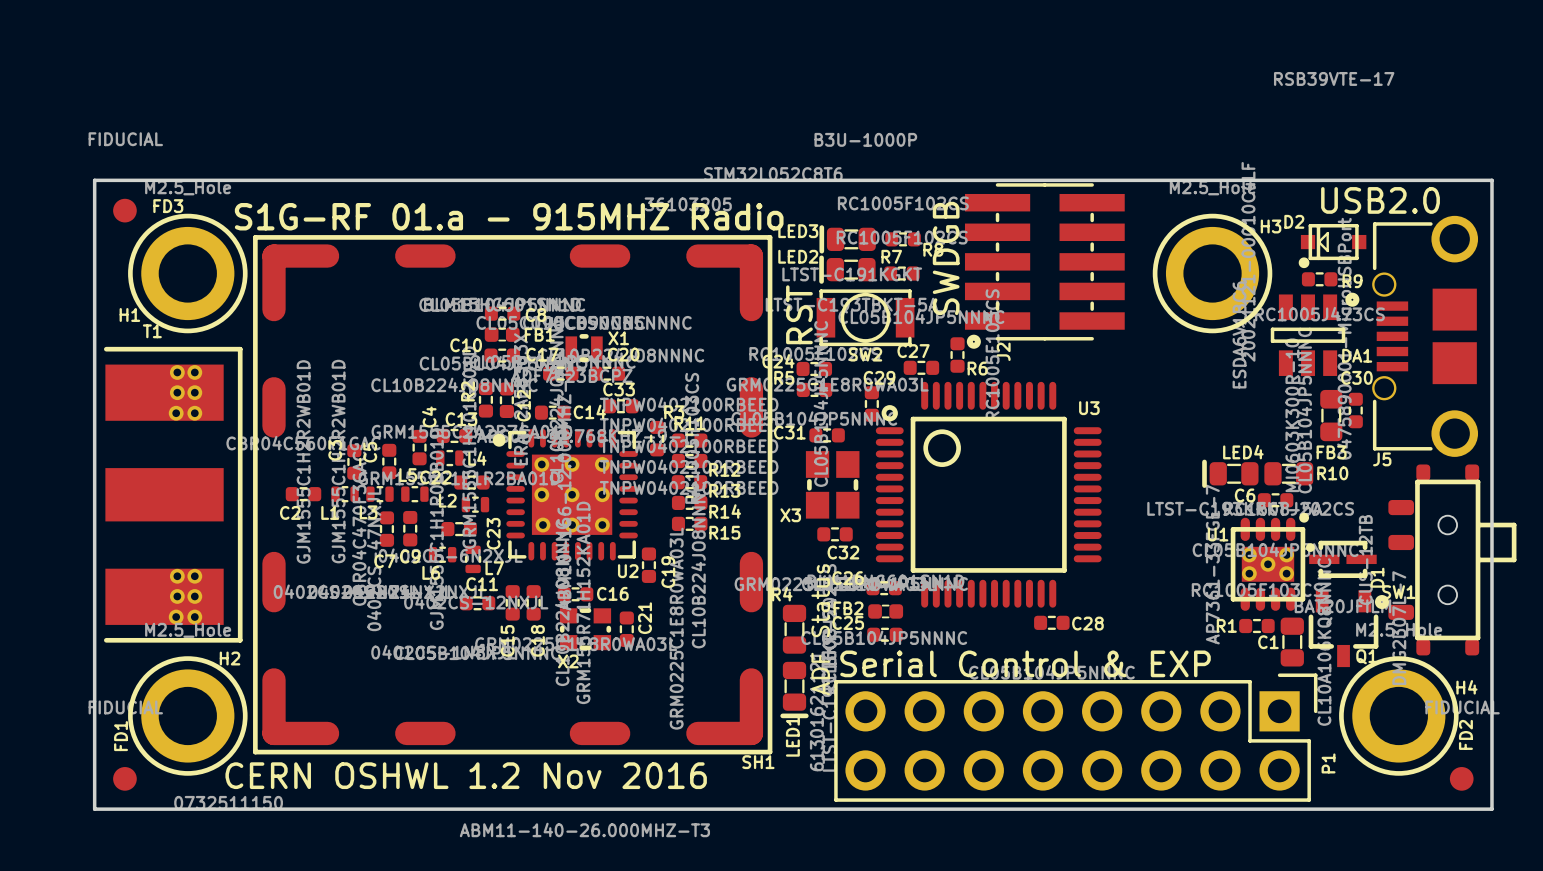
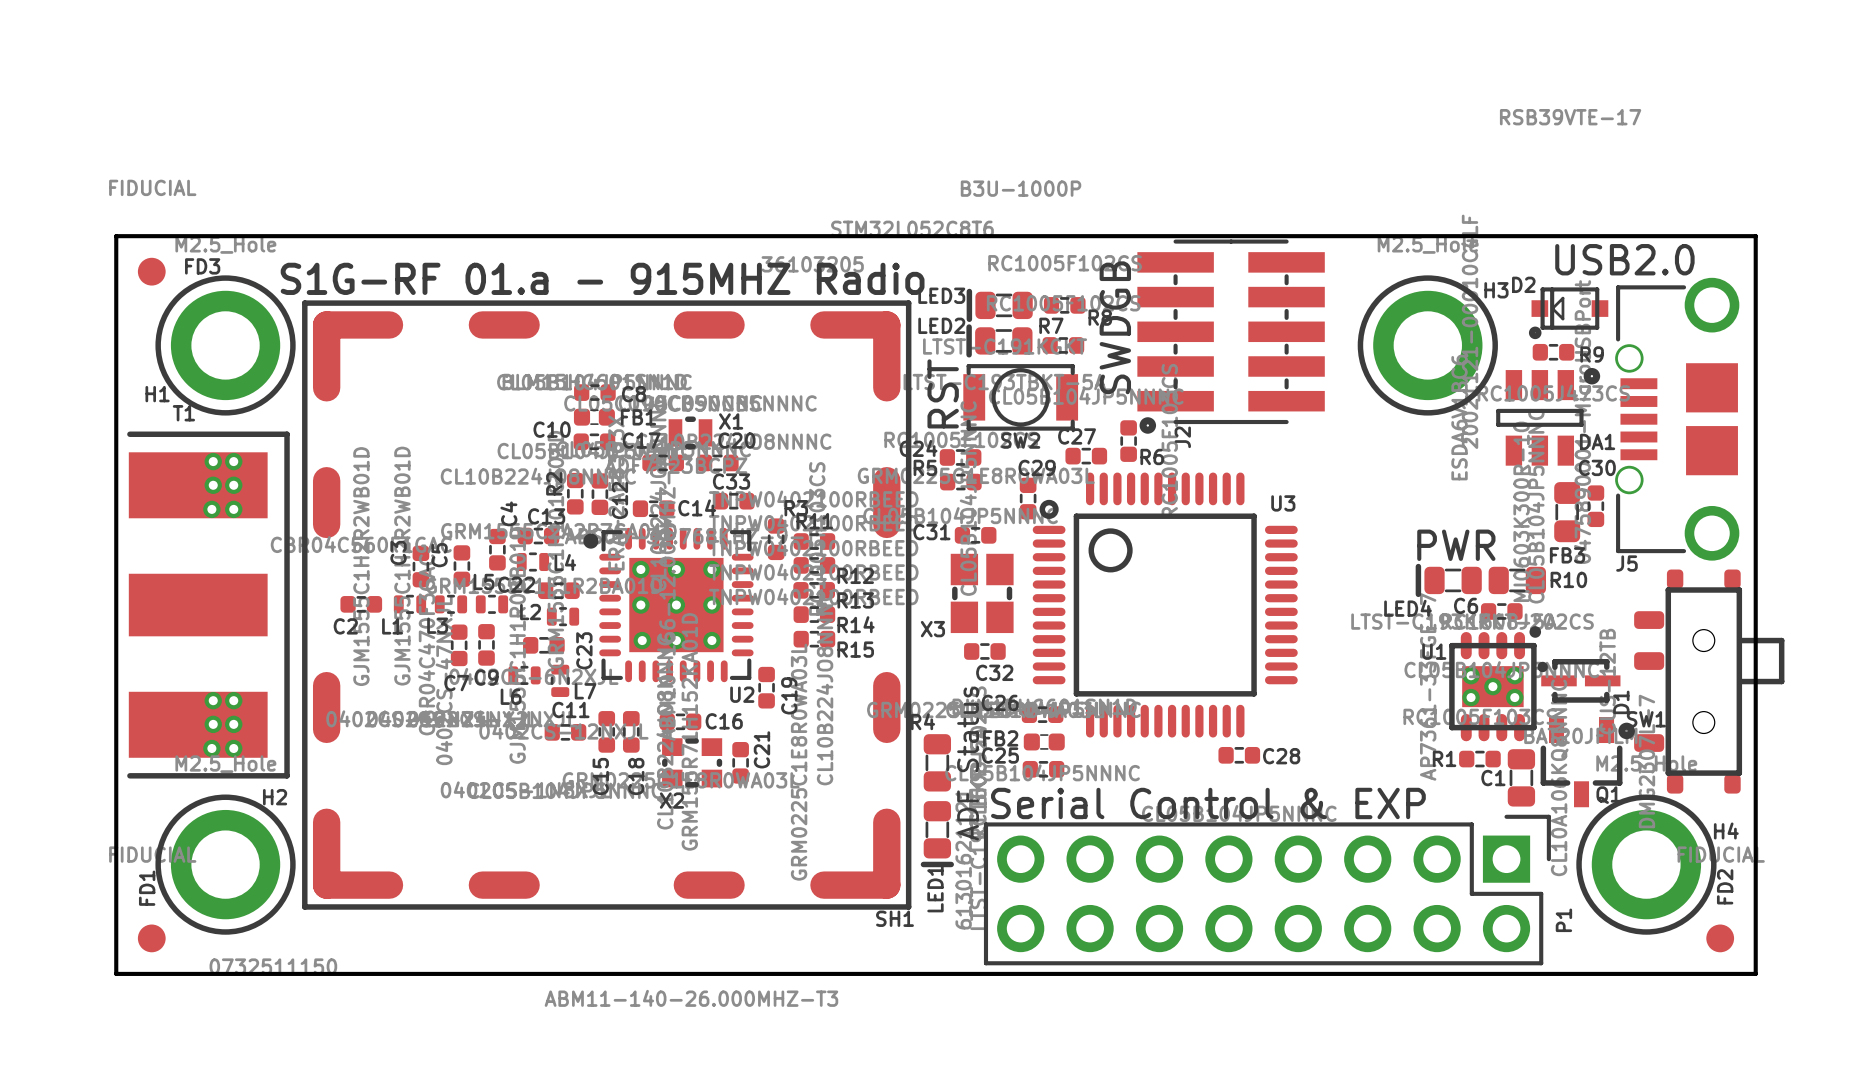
text: none -> PWR (1456, 545)
LED4 name position: LED4 (1243, 452) -> LED4 (1407, 608)
text: CERN OSHWL 1.2 Nov 2016 (466, 775) -> none

